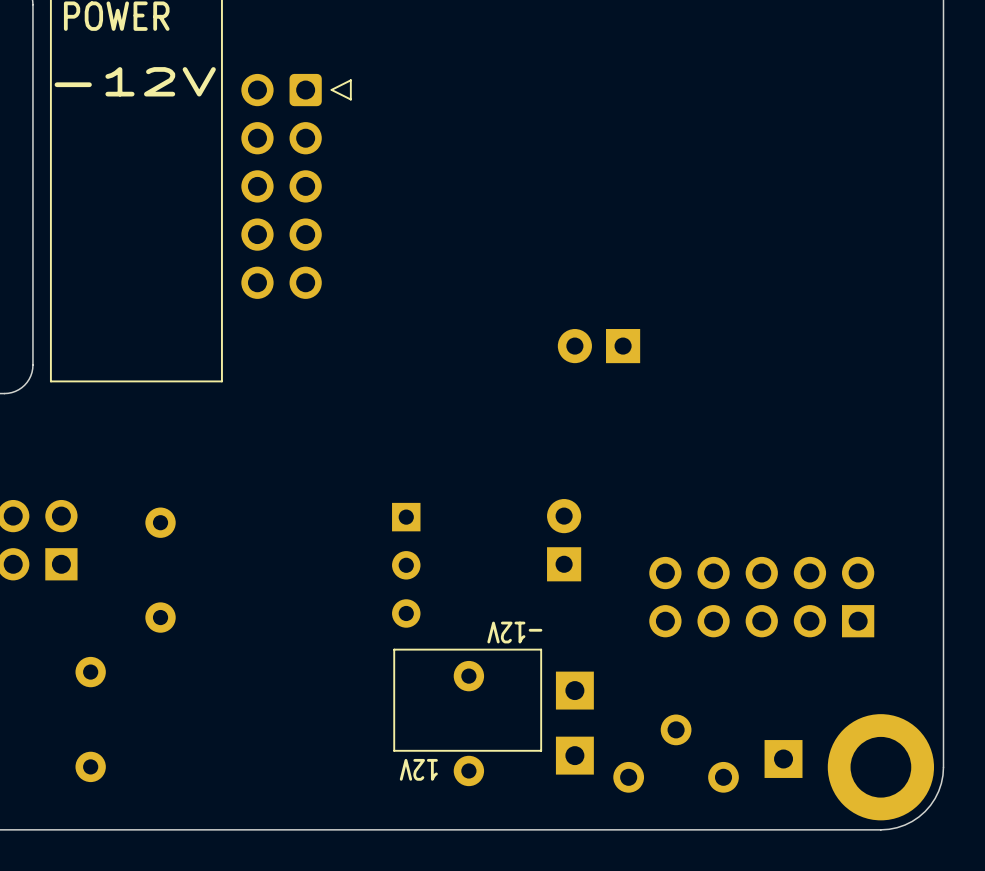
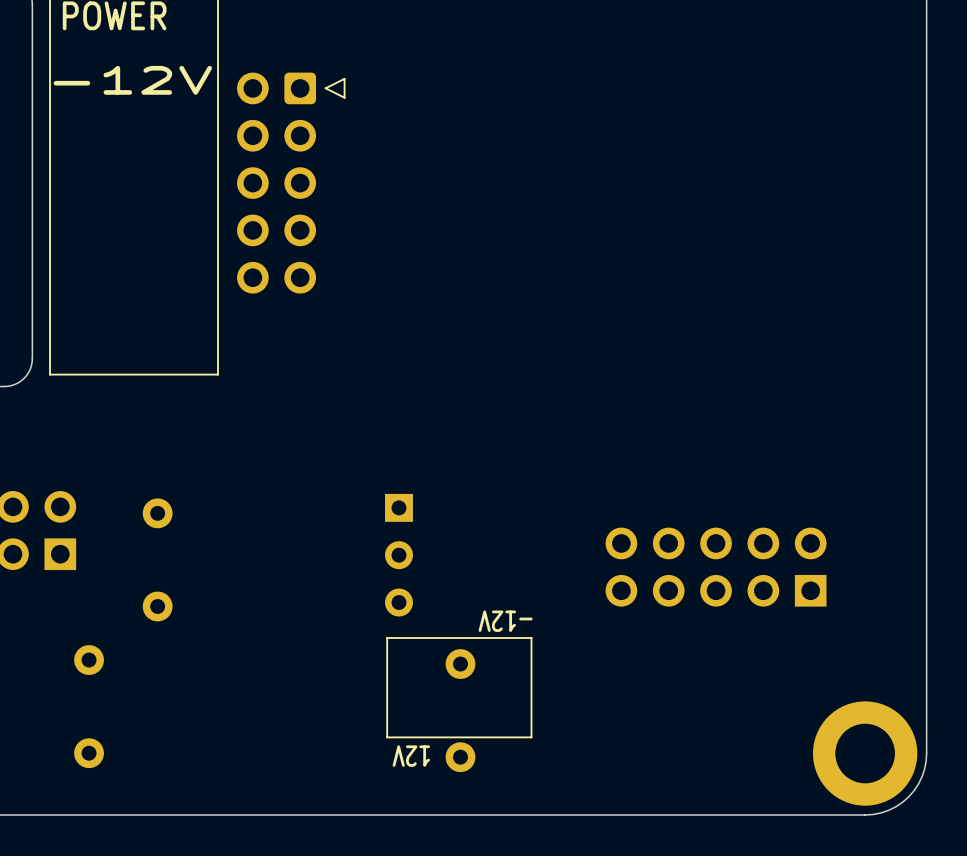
part: (598, 346) -> none
part: (564, 540) -> none
part position: (761, 597) -> (716, 567)
part: (574, 690) -> none
part: (676, 753) -> none
part: (574, 755) -> none
part: (783, 759) -> none

